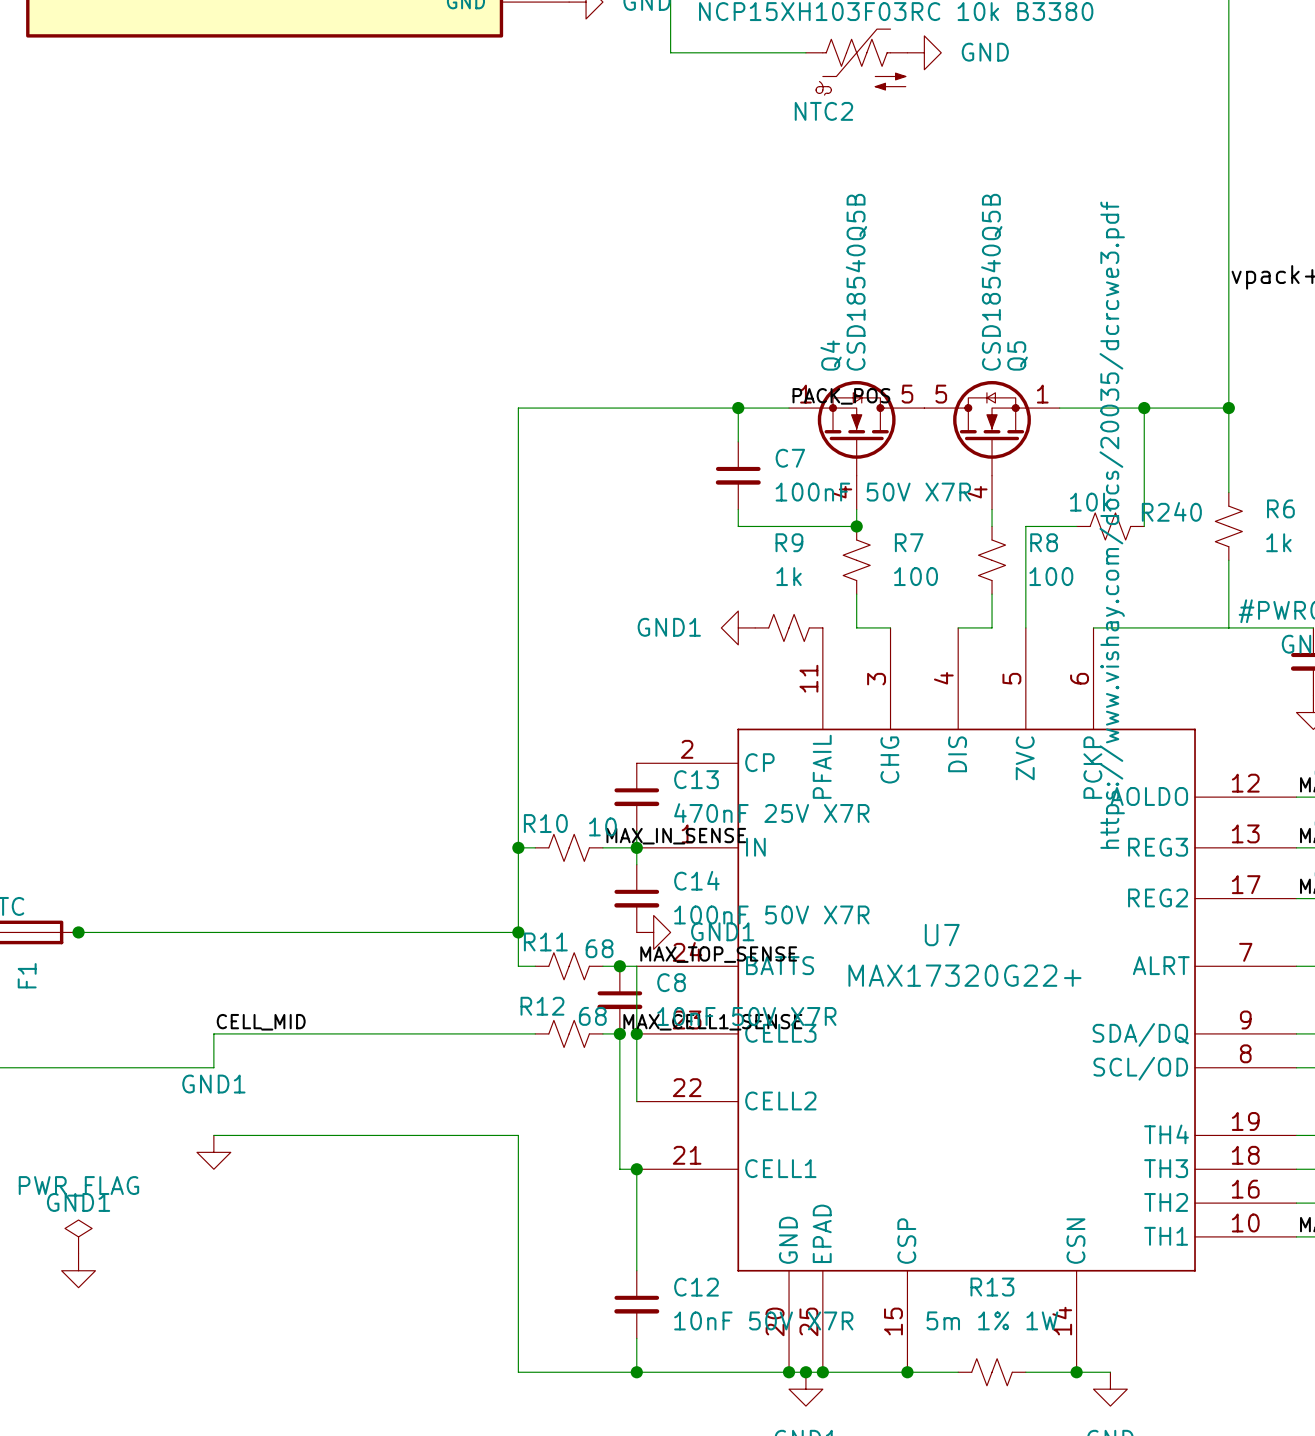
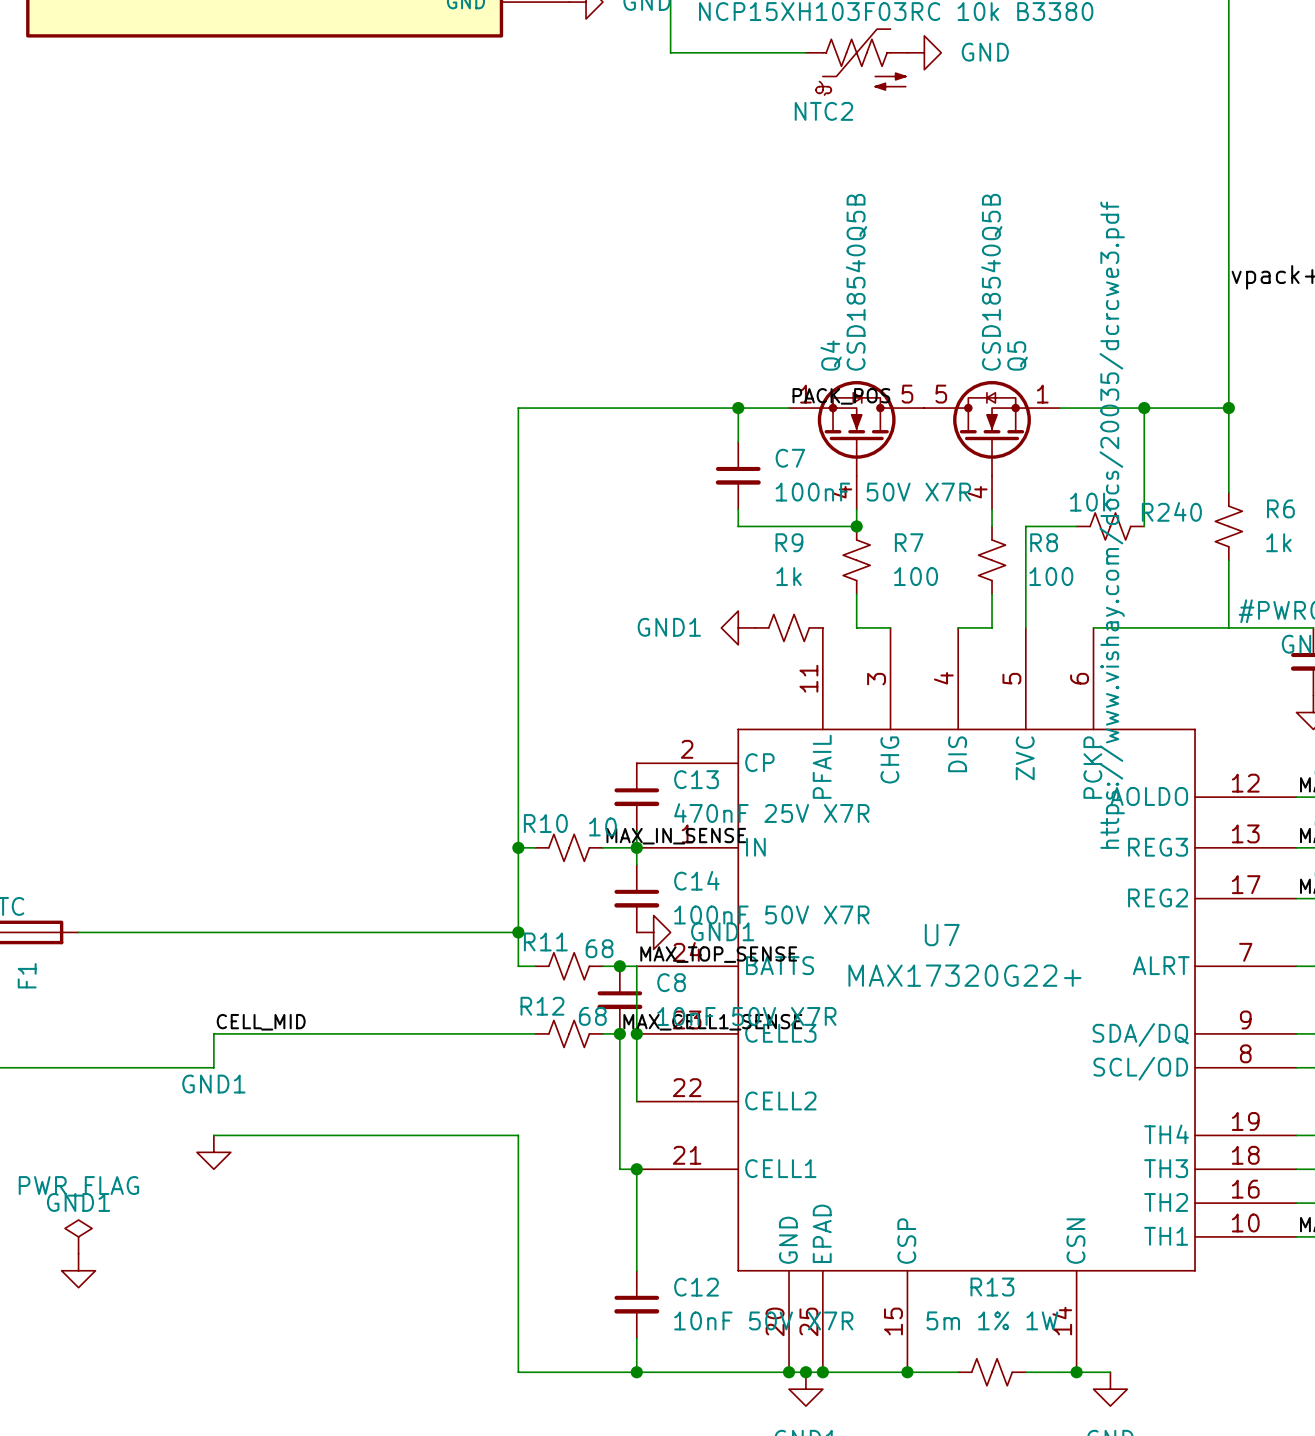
junction: (78, 932) -> none

